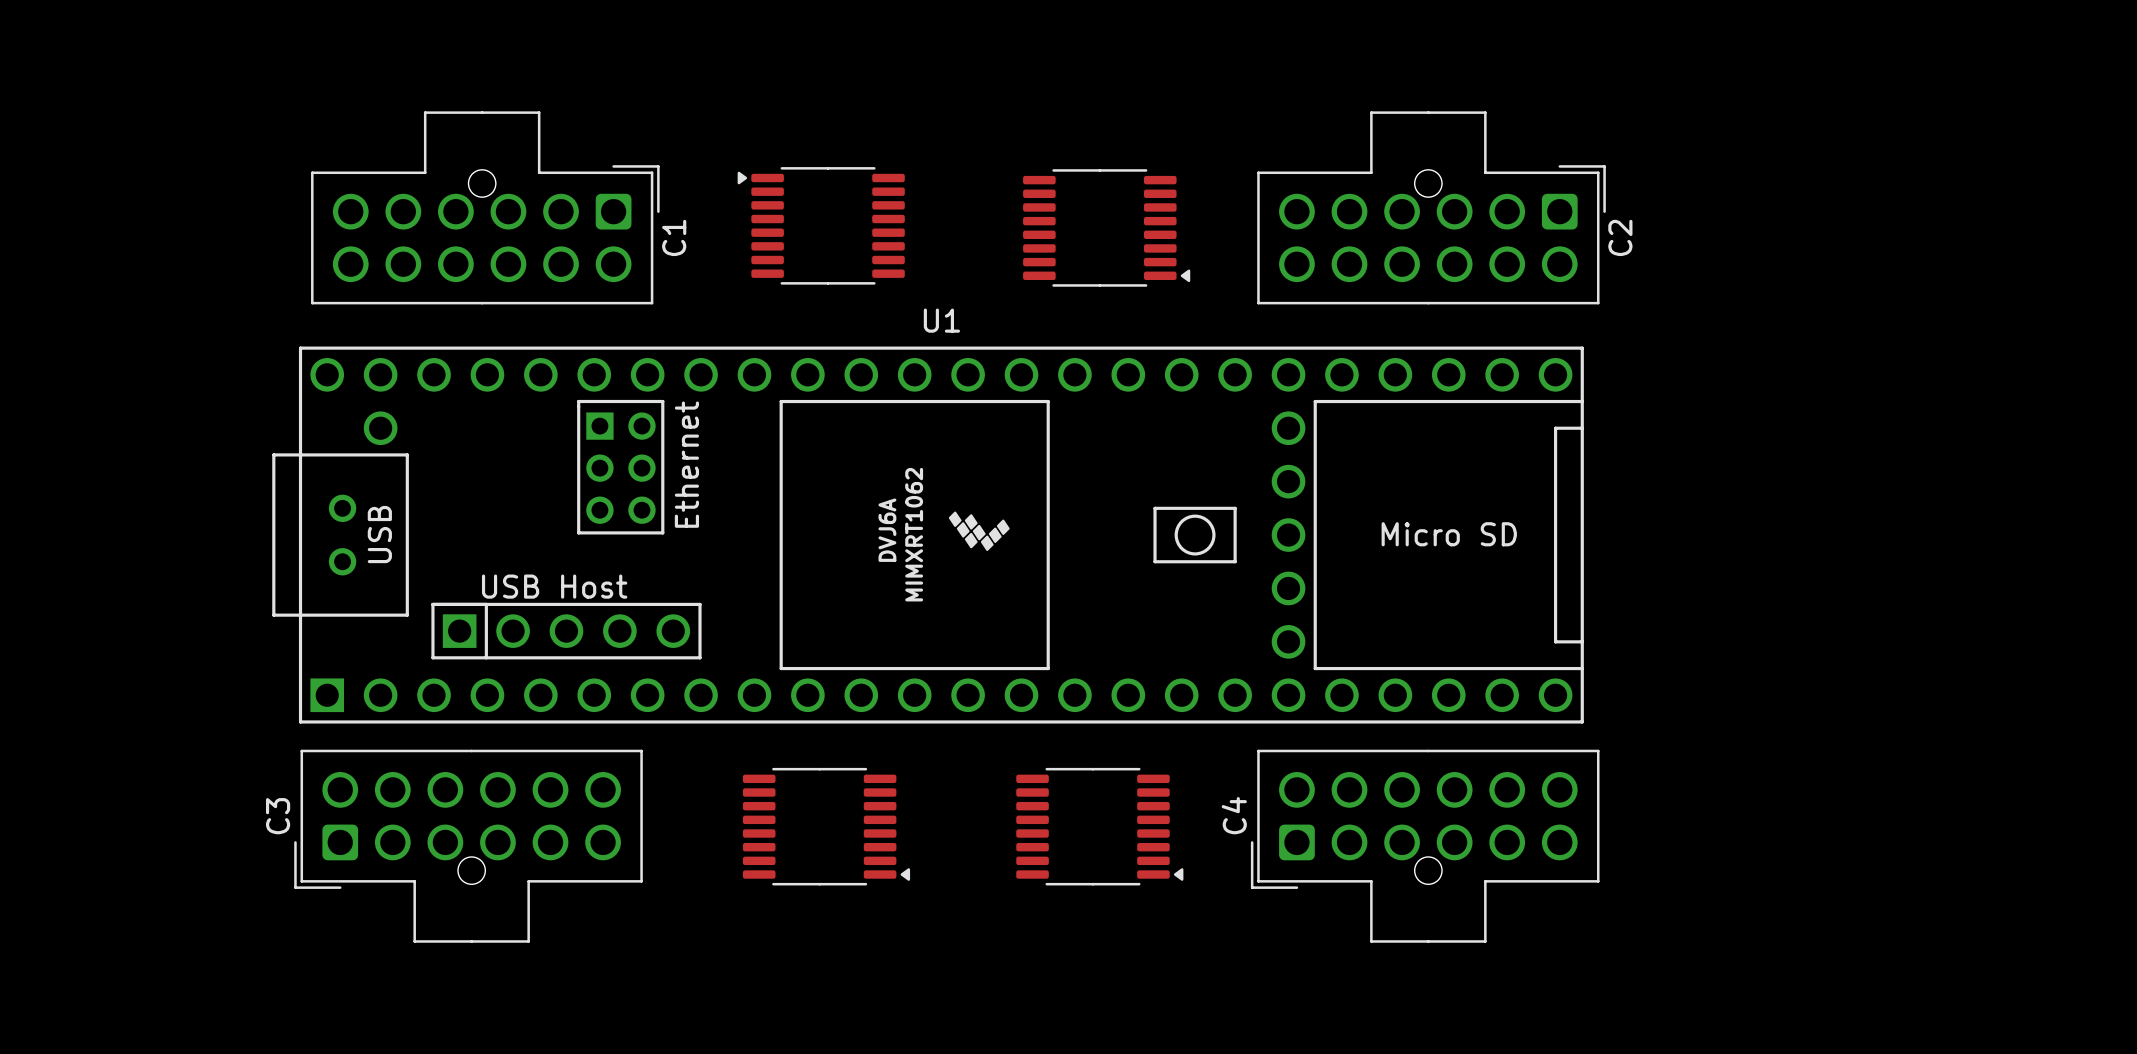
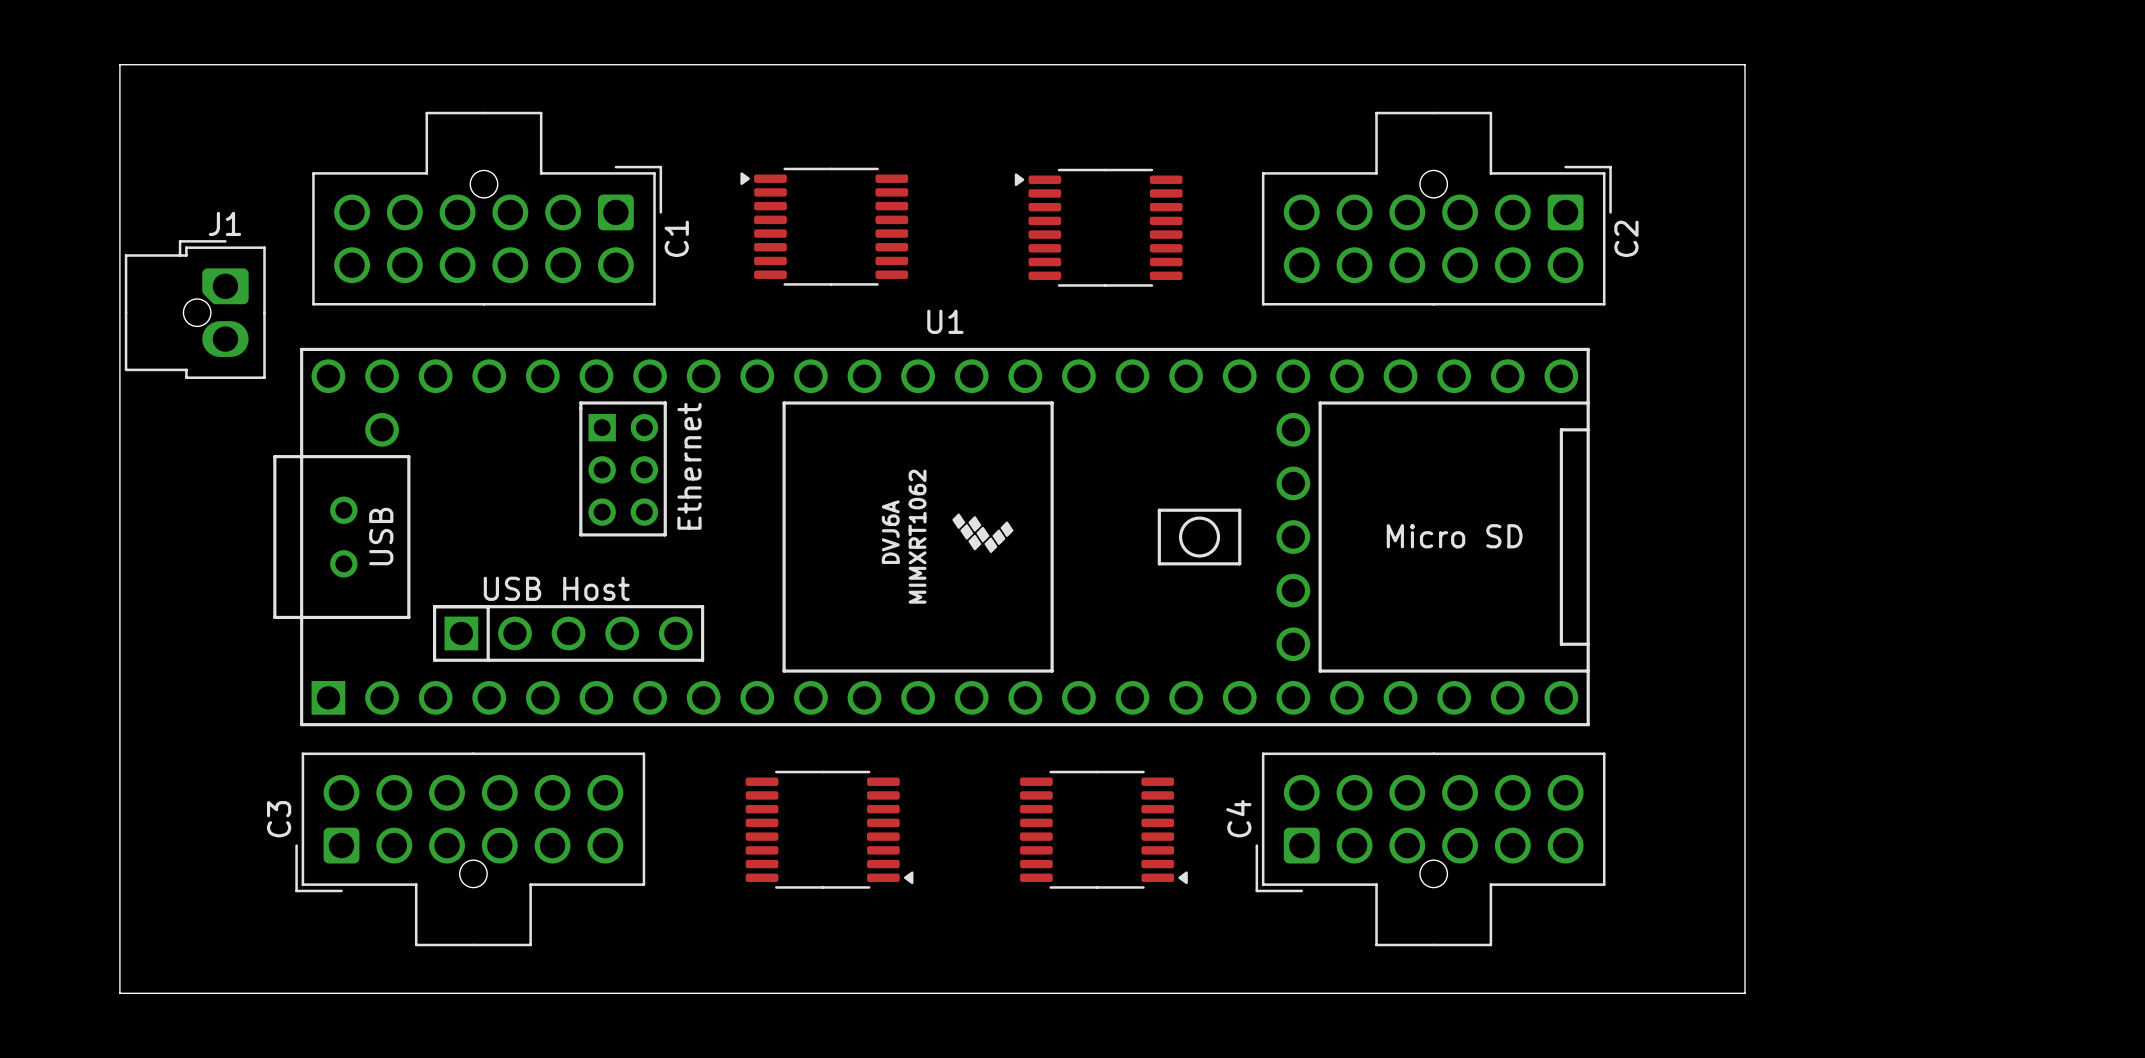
board edge: none -> (119, 64) (1744, 64) (1744, 993) (119, 993) (119, 64)
part rotation: 0° (1106, 227) -> 180° (1098, 227)
J1: none -> (195, 309)

